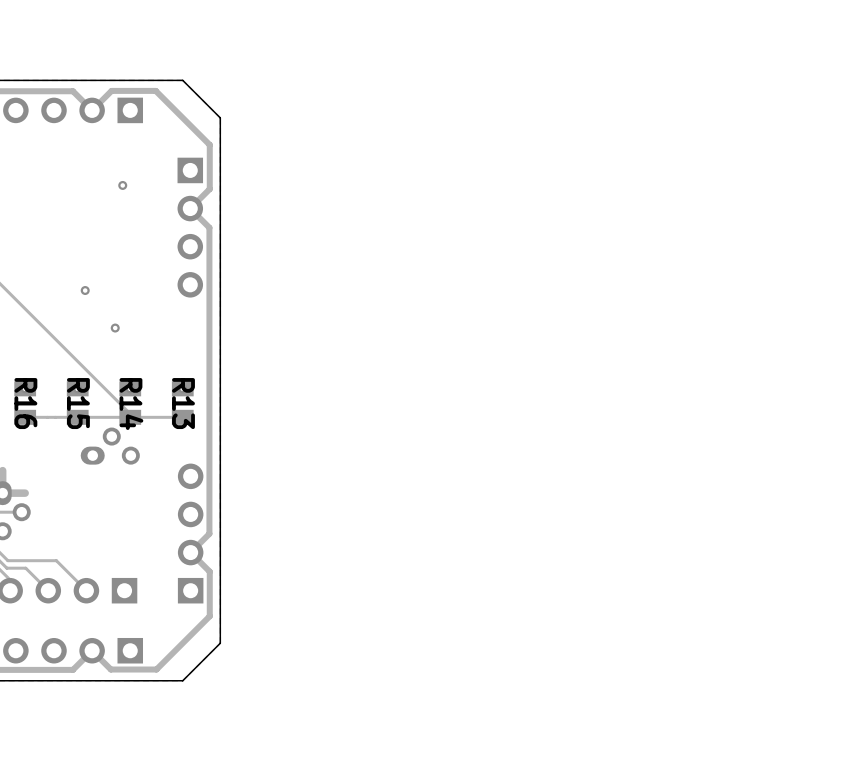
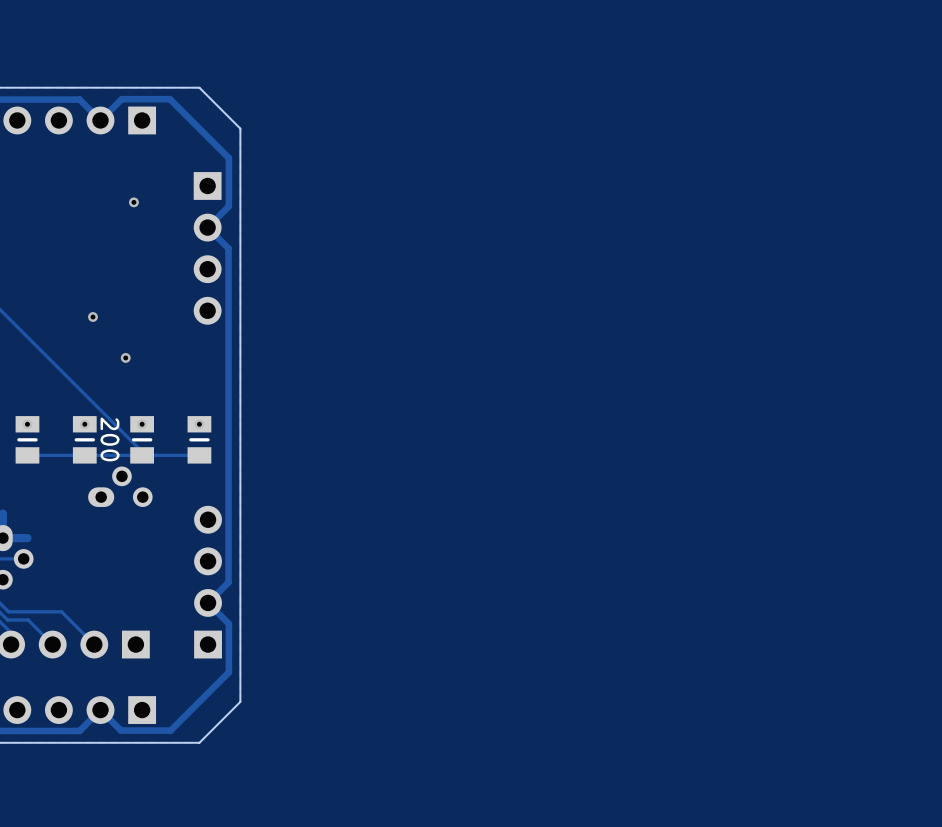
R16 name: R16 (25, 403) -> none
R15 name: R15 (78, 403) -> 200 (109, 439)
R14 name: R14 (131, 403) -> none
R13 name: R13 (183, 403) -> none

